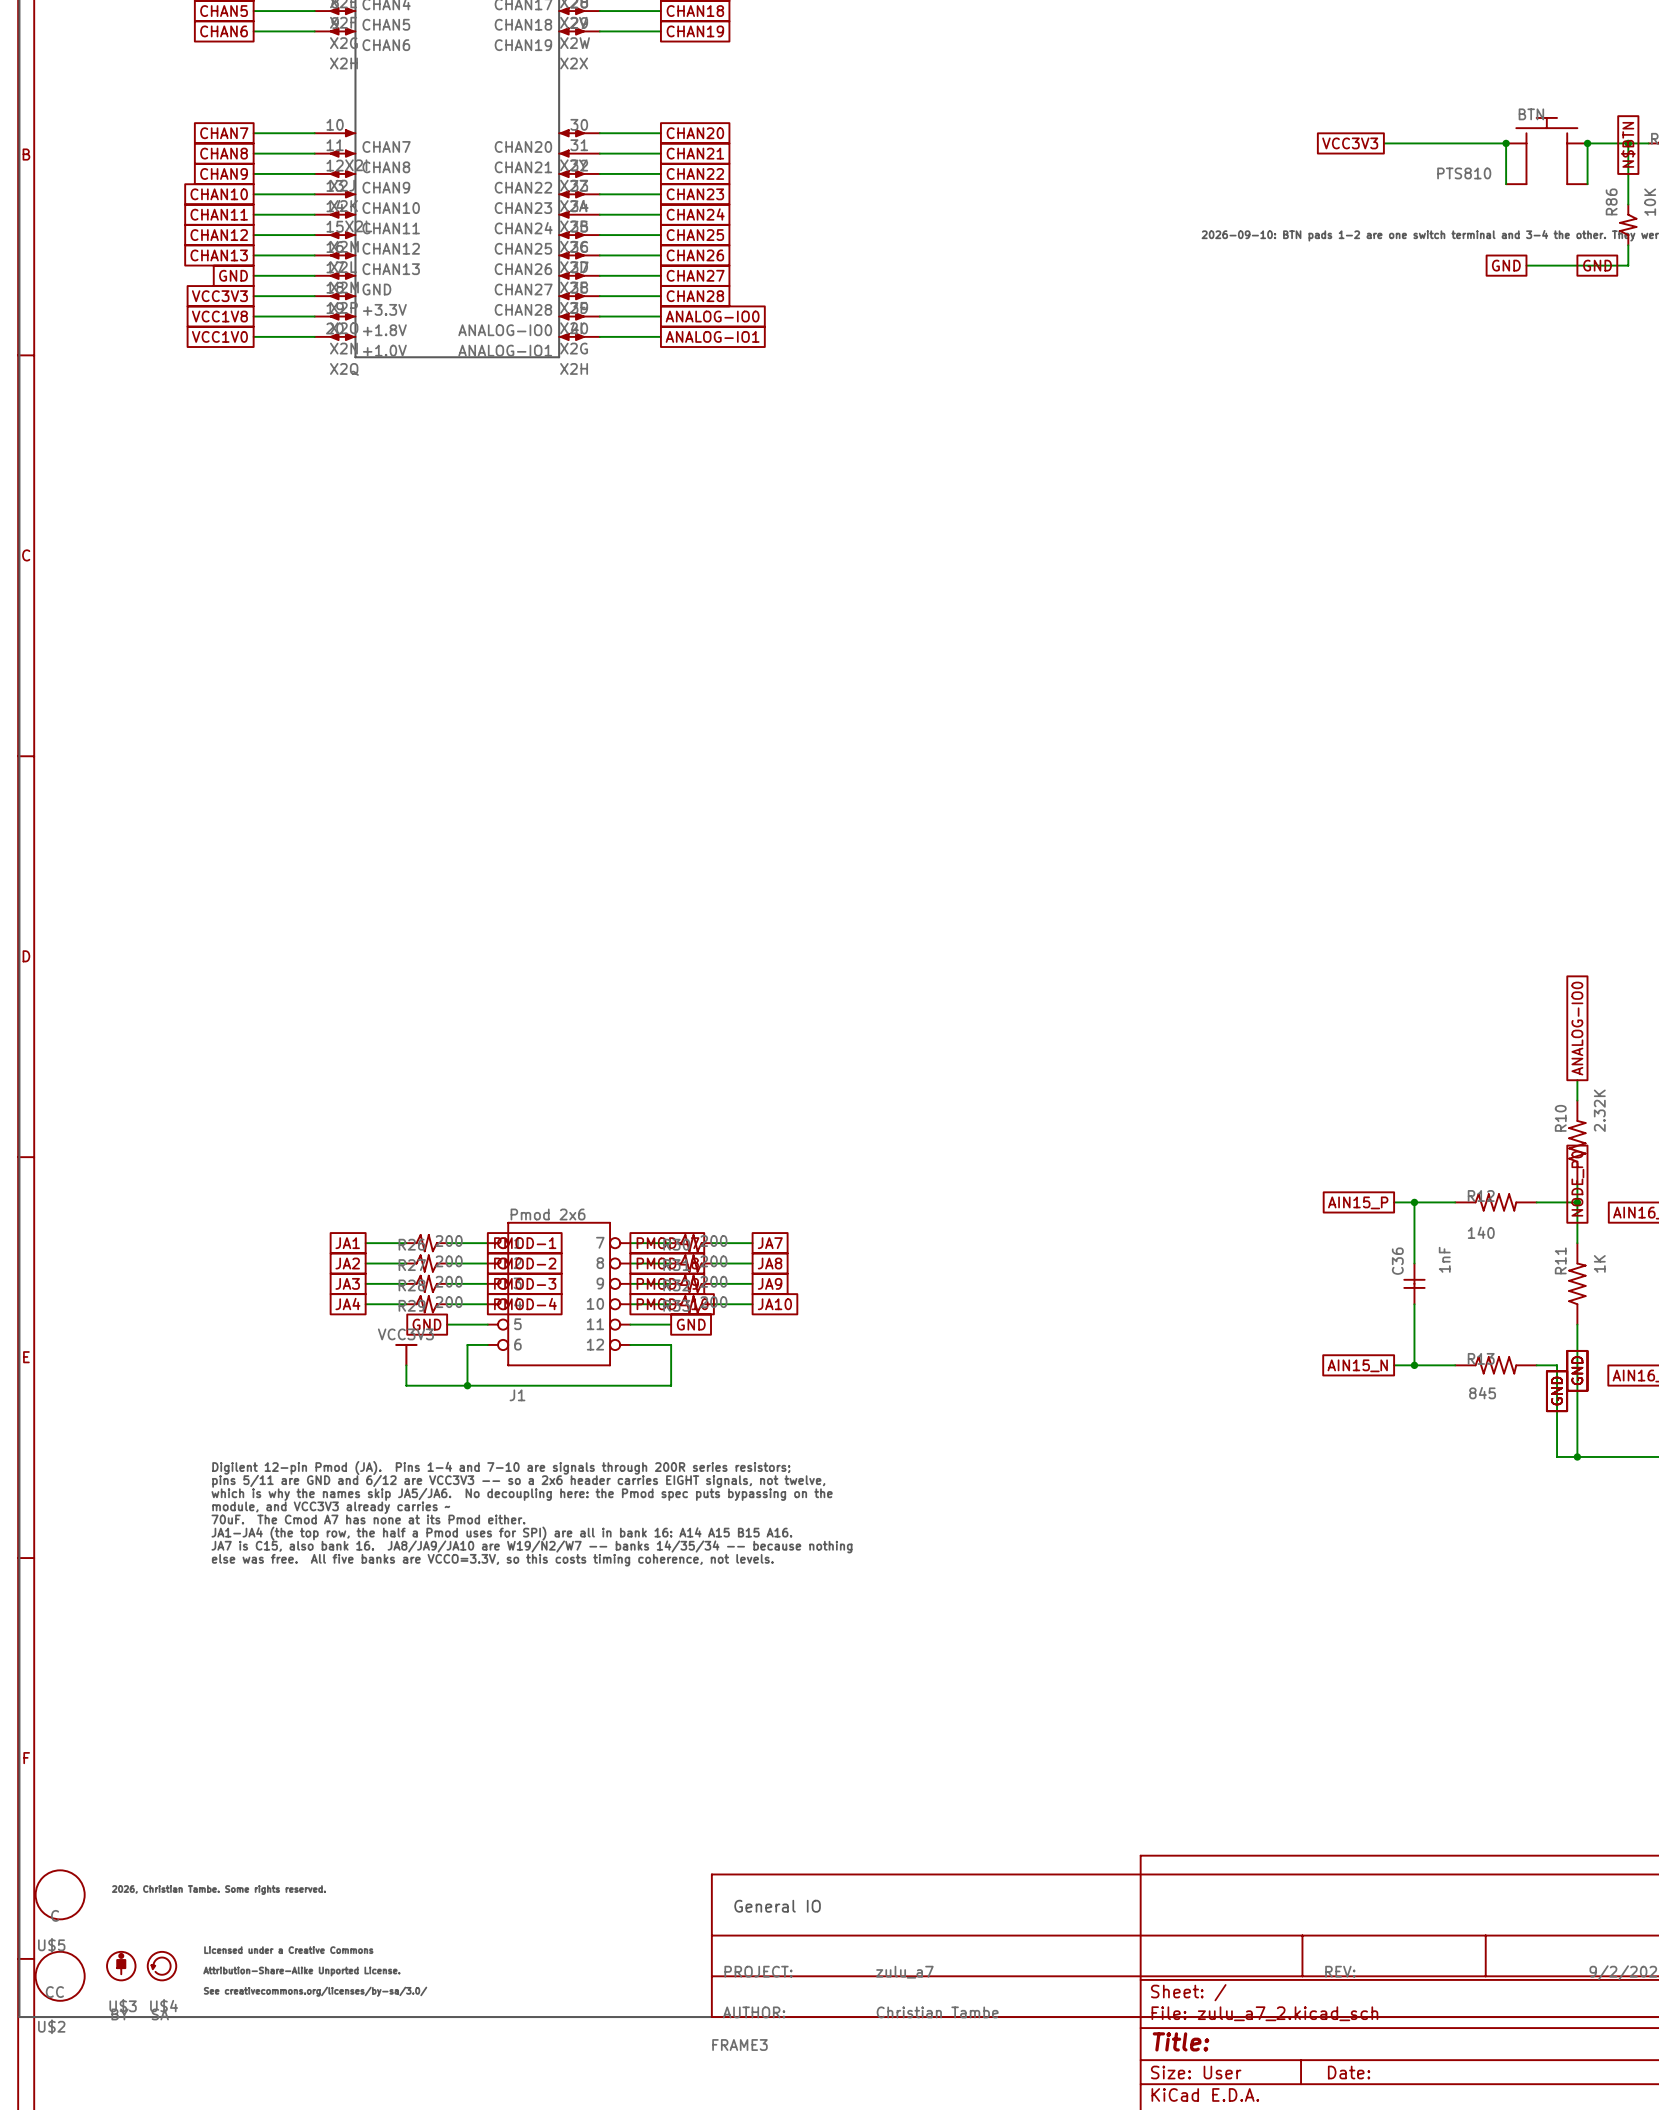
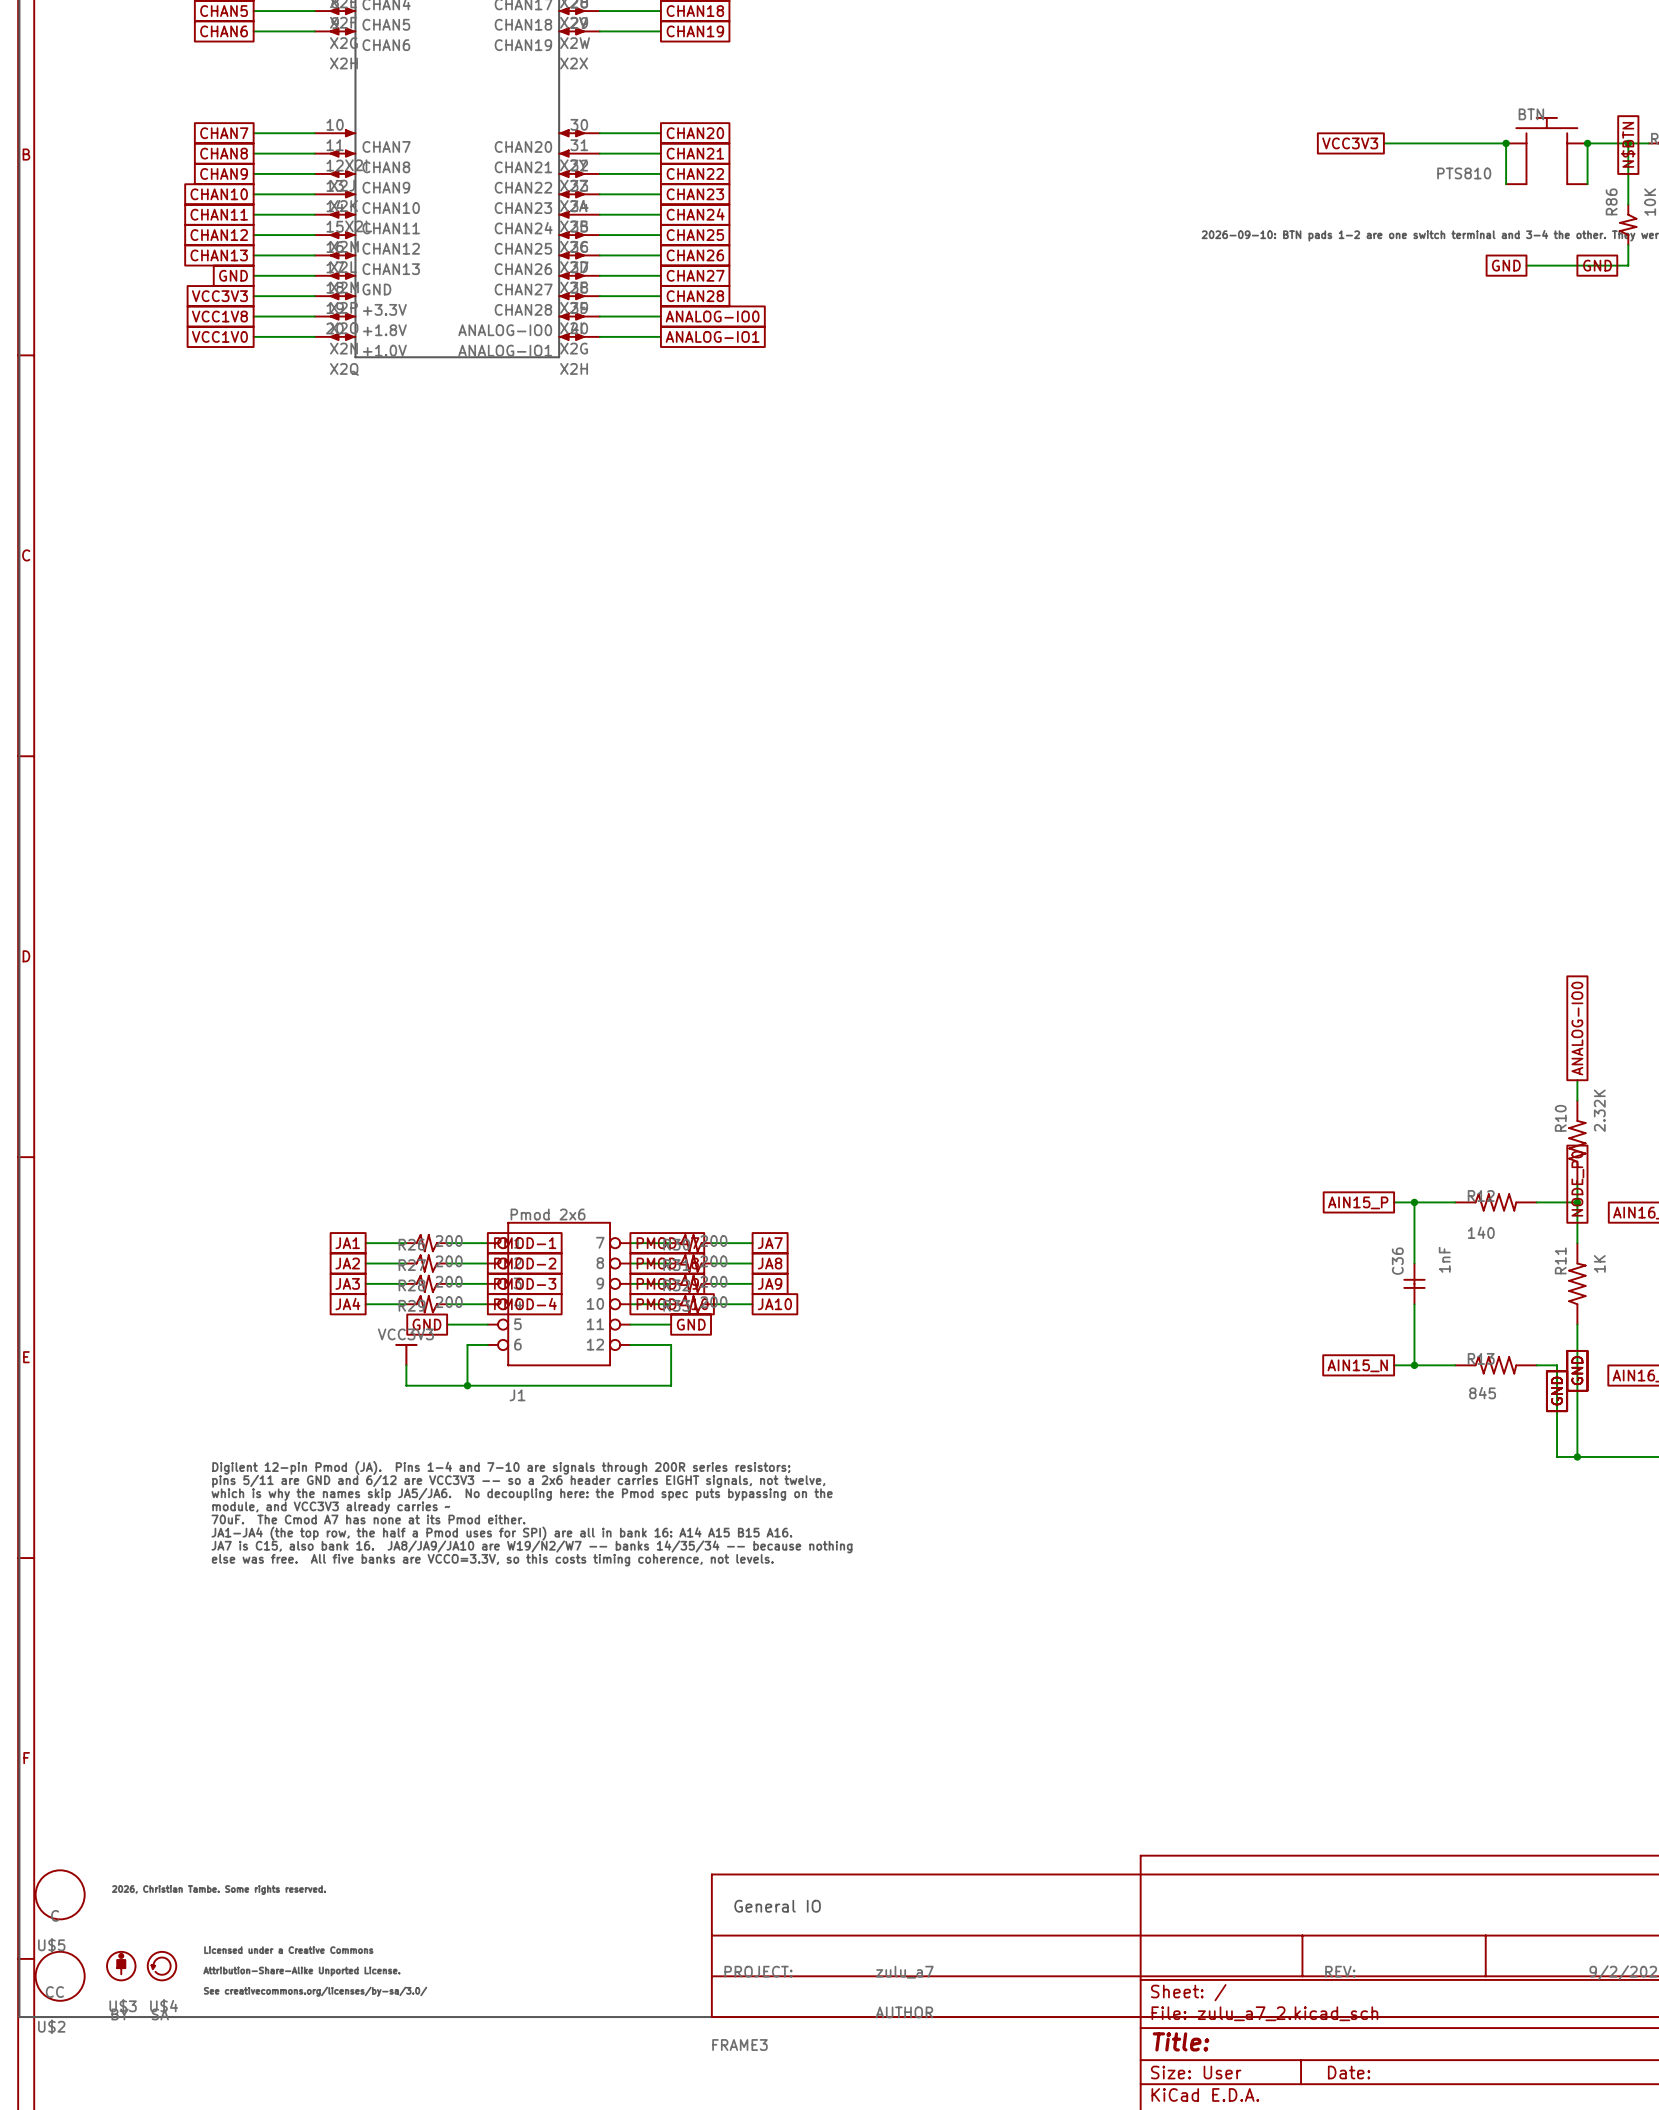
FRAME3 text: AUTHOR: (754, 2012) -> none
FRAME3 text: Christian Tambe (937, 2012) -> AUTHOR (904, 2012)

